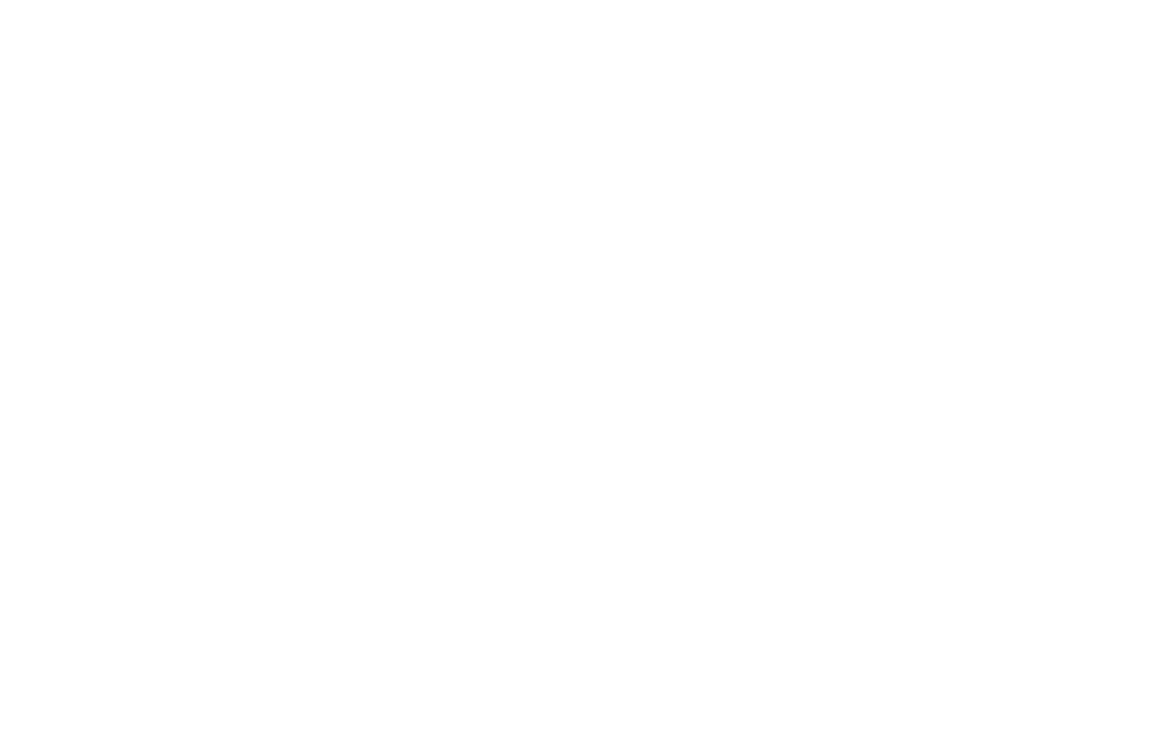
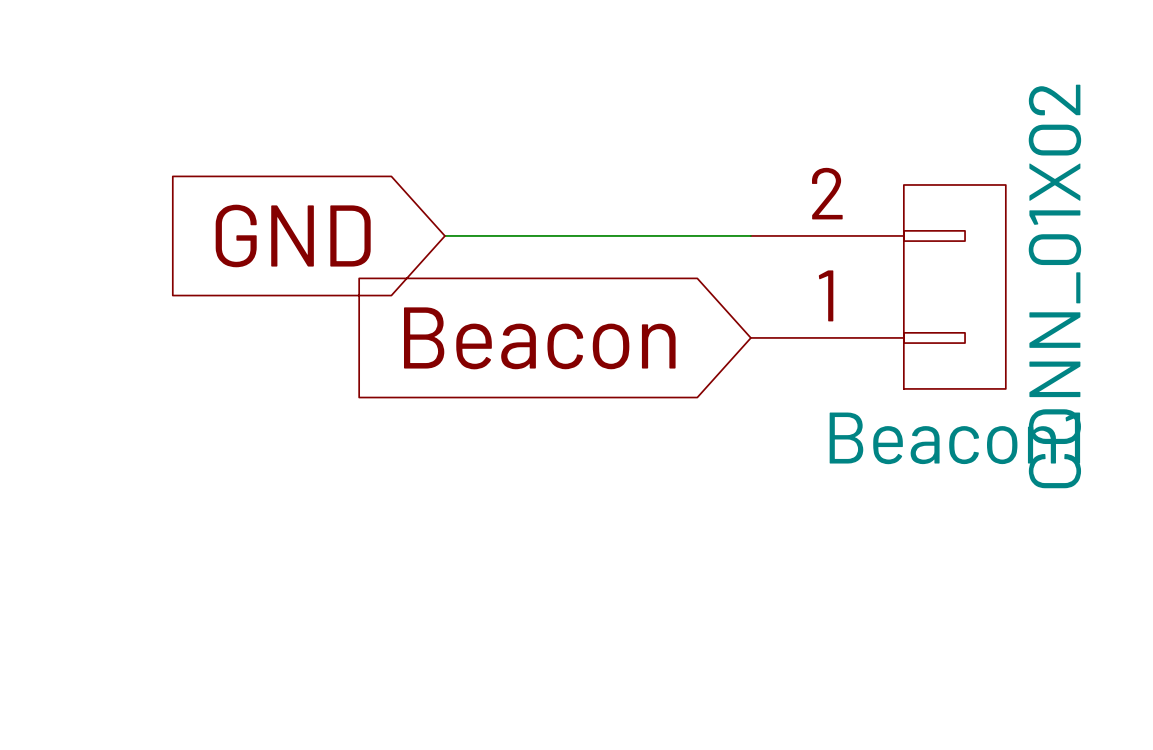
global label: none -> GND (293, 235)
wire: none -> (444, 235) (750, 235)
Beacon1: none -> CONN_01X02 (878, 286)
global label: none -> Beacon (539, 338)

